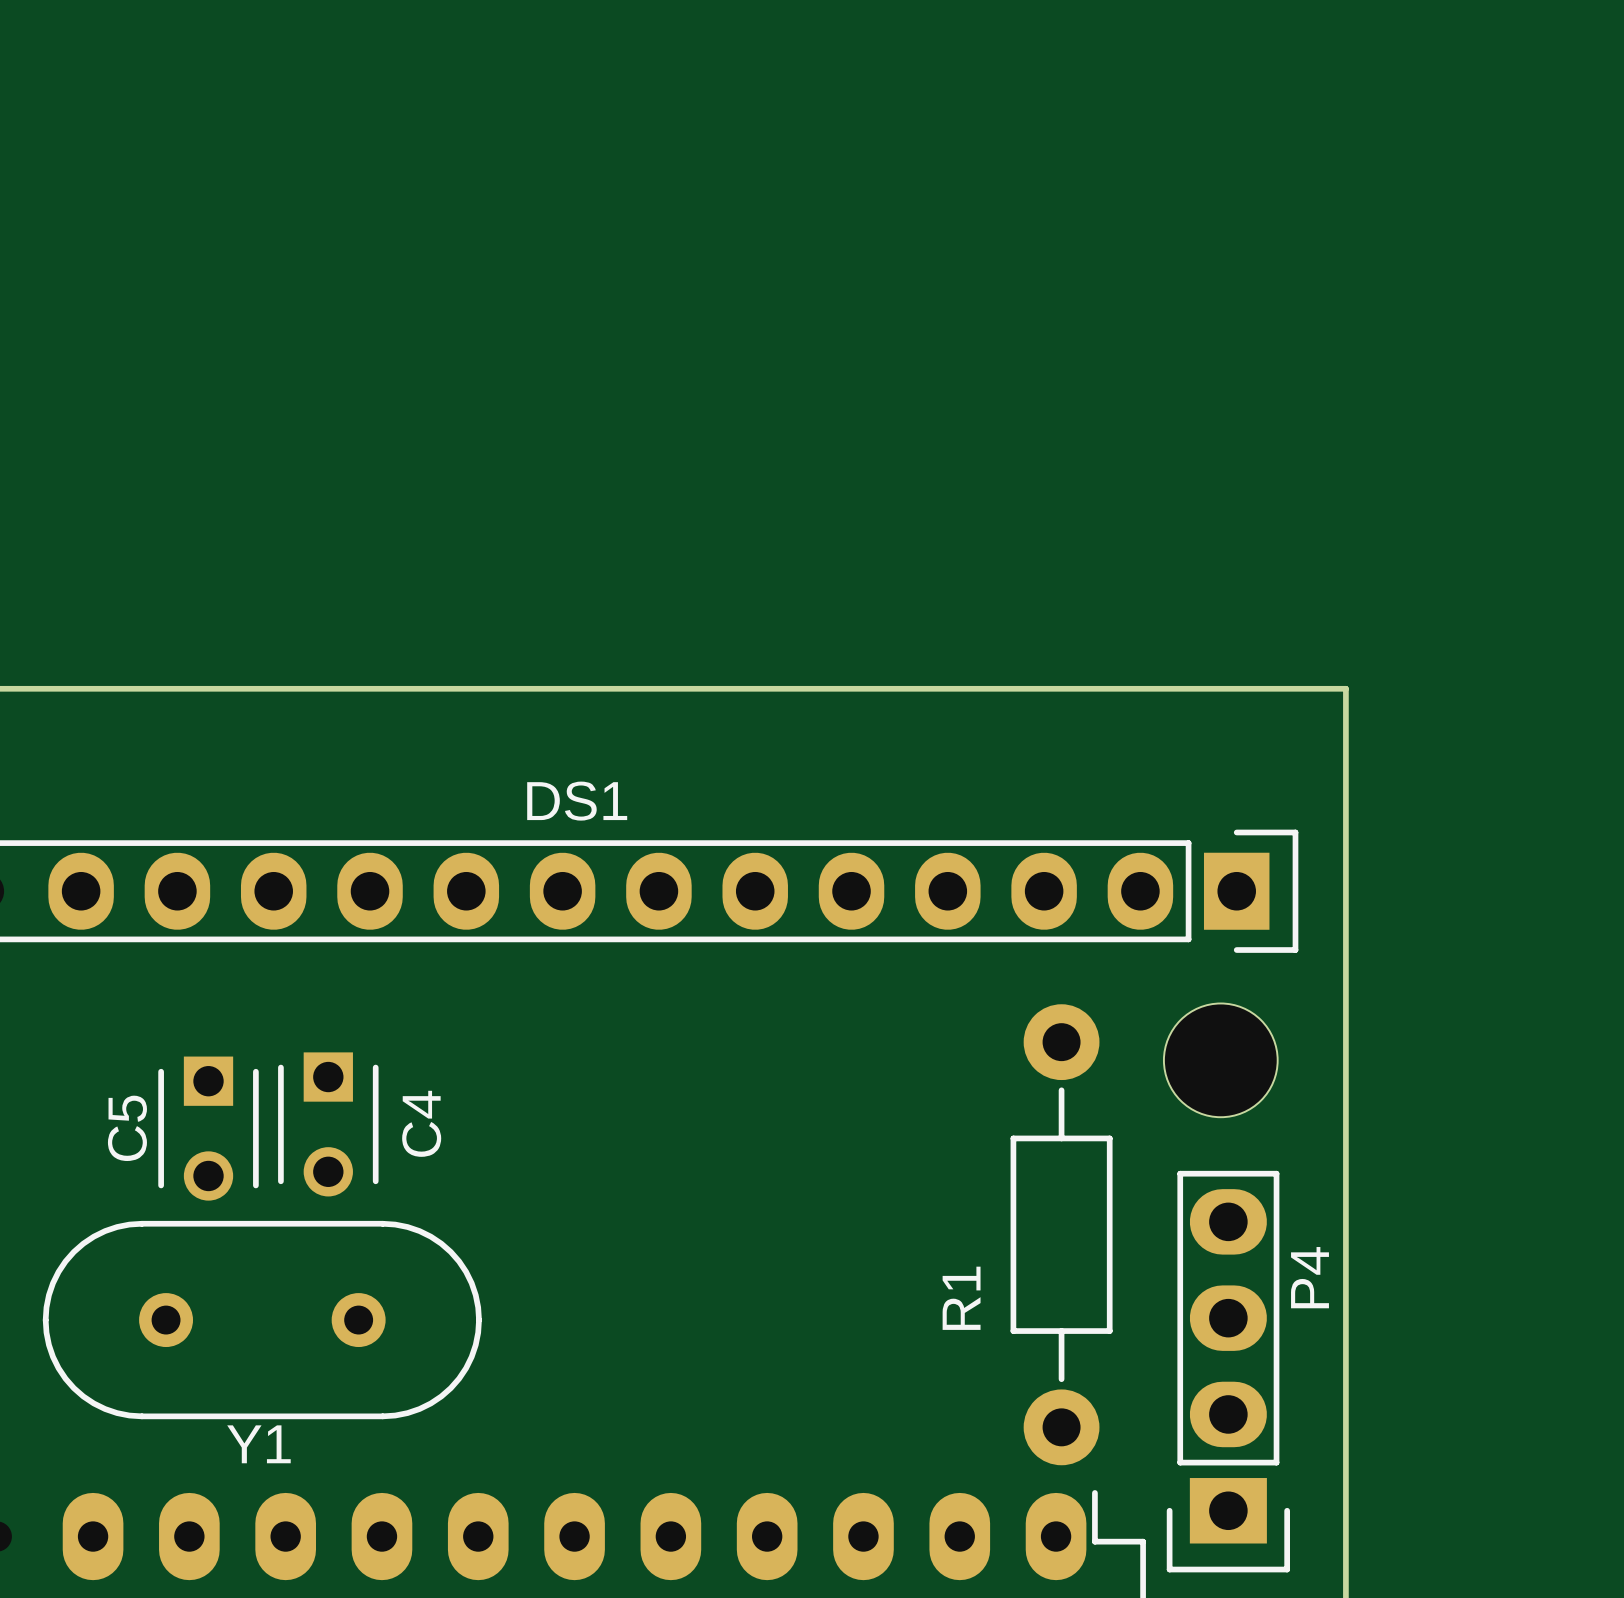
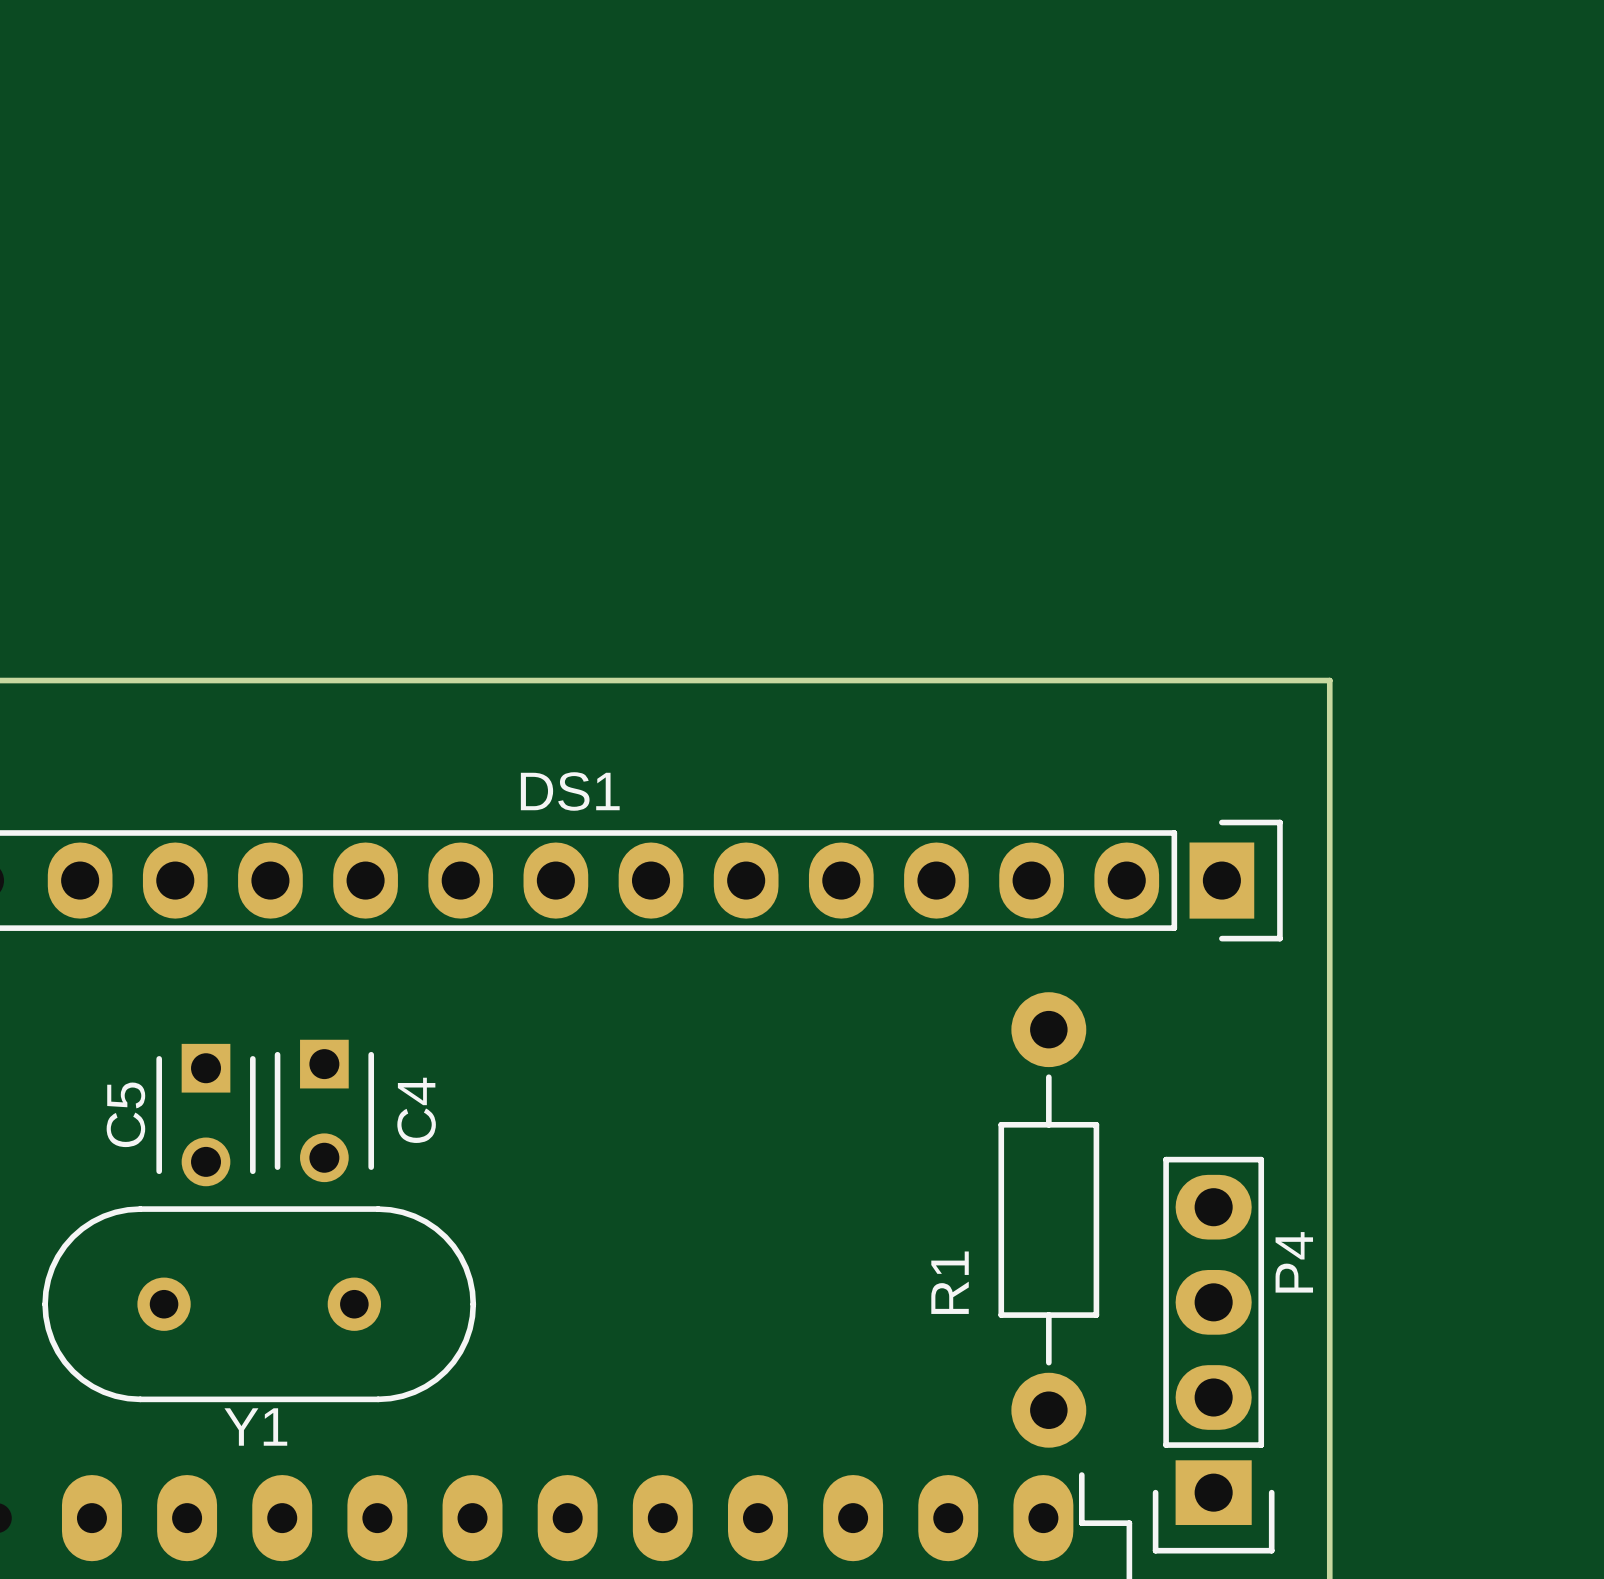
part: (1220, 1060) -> none

